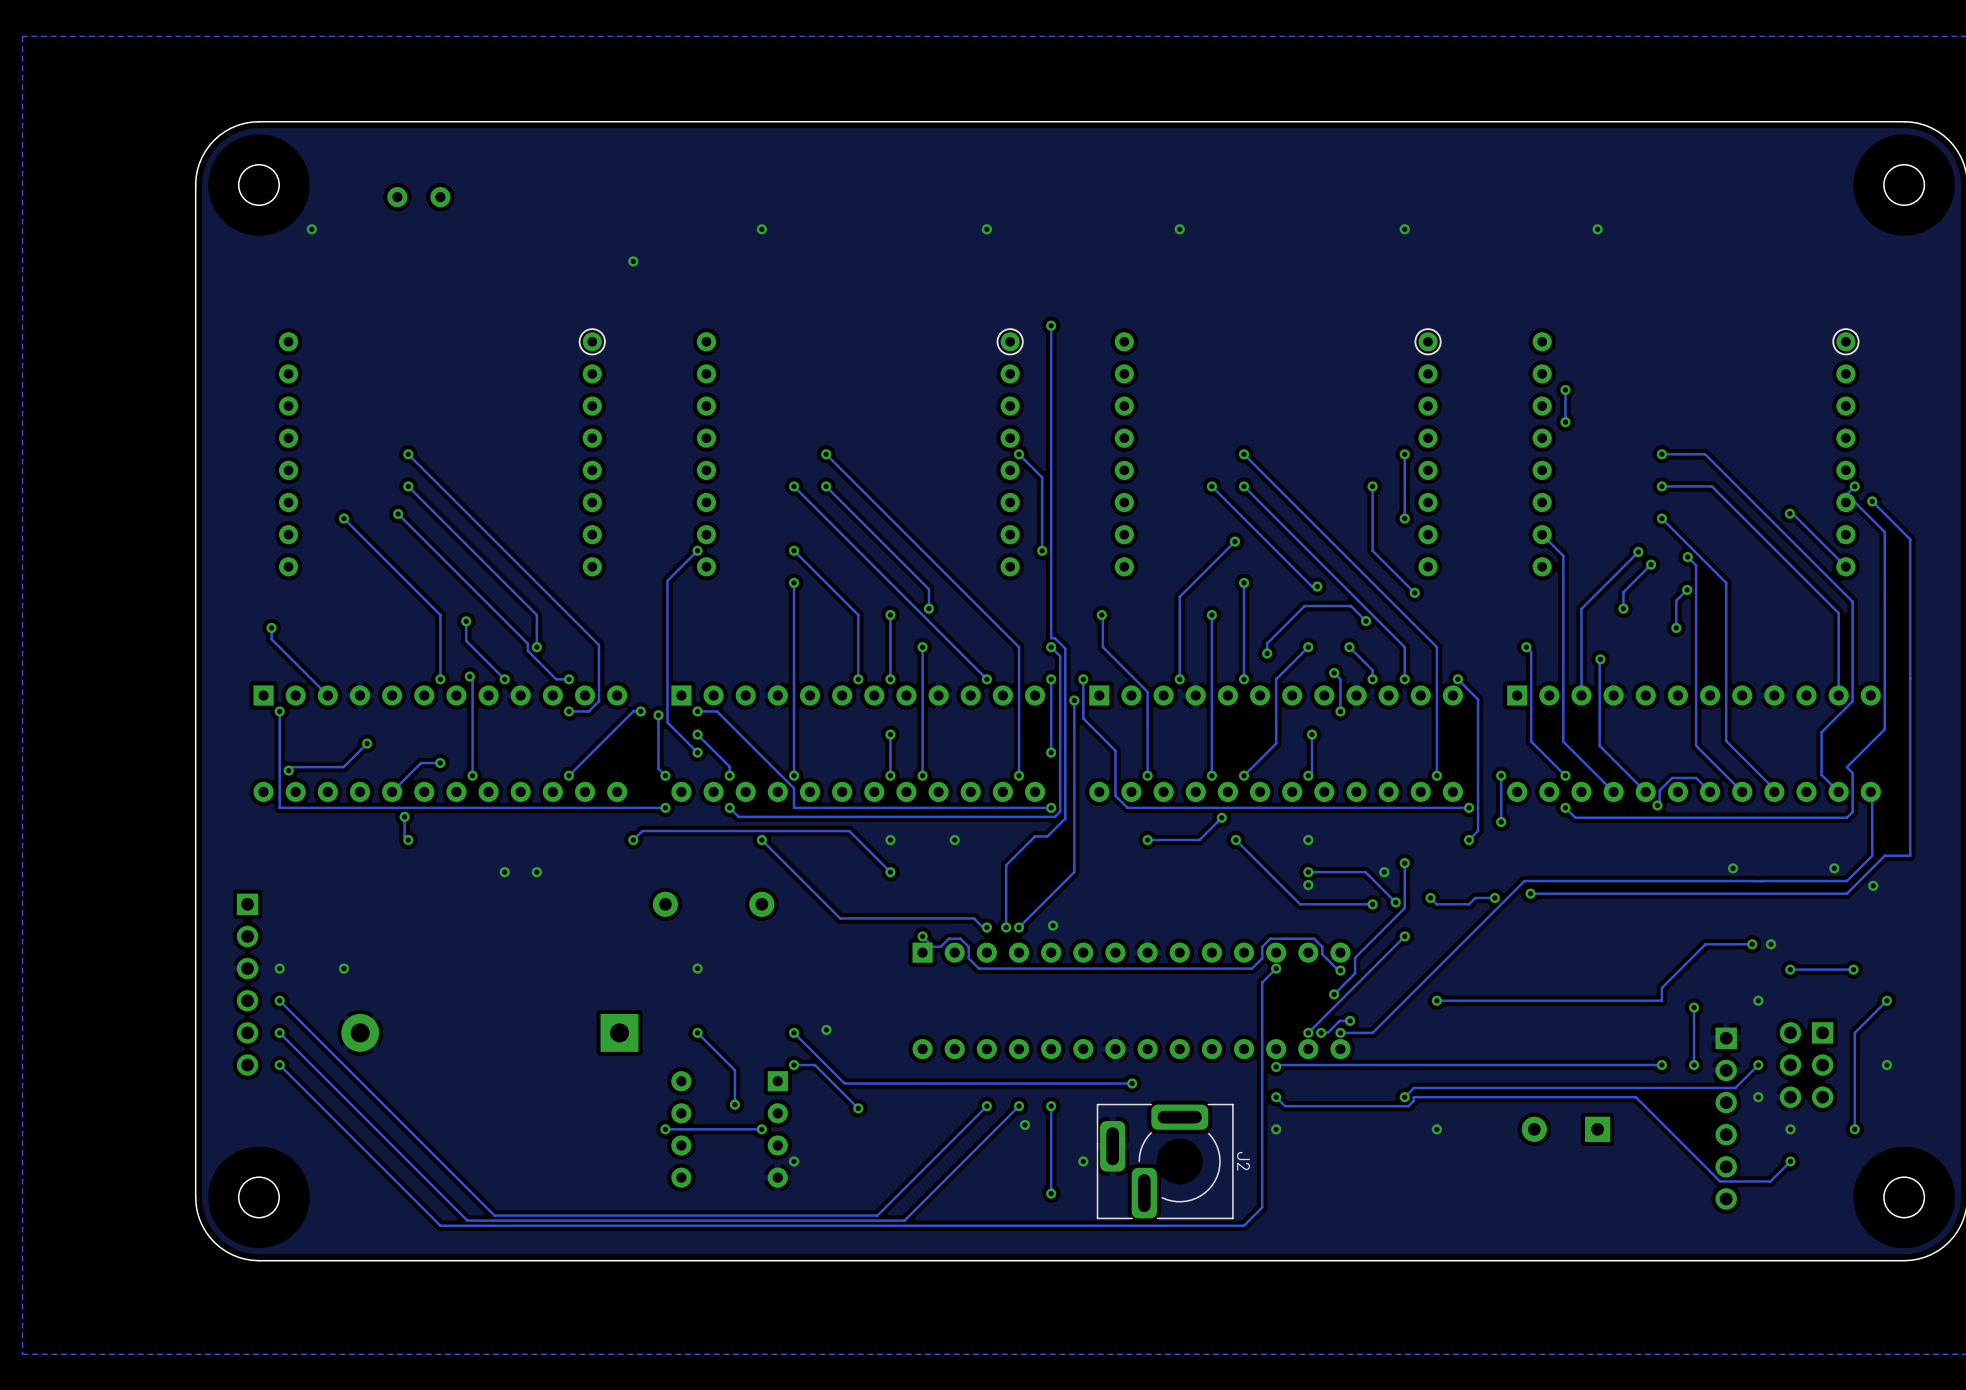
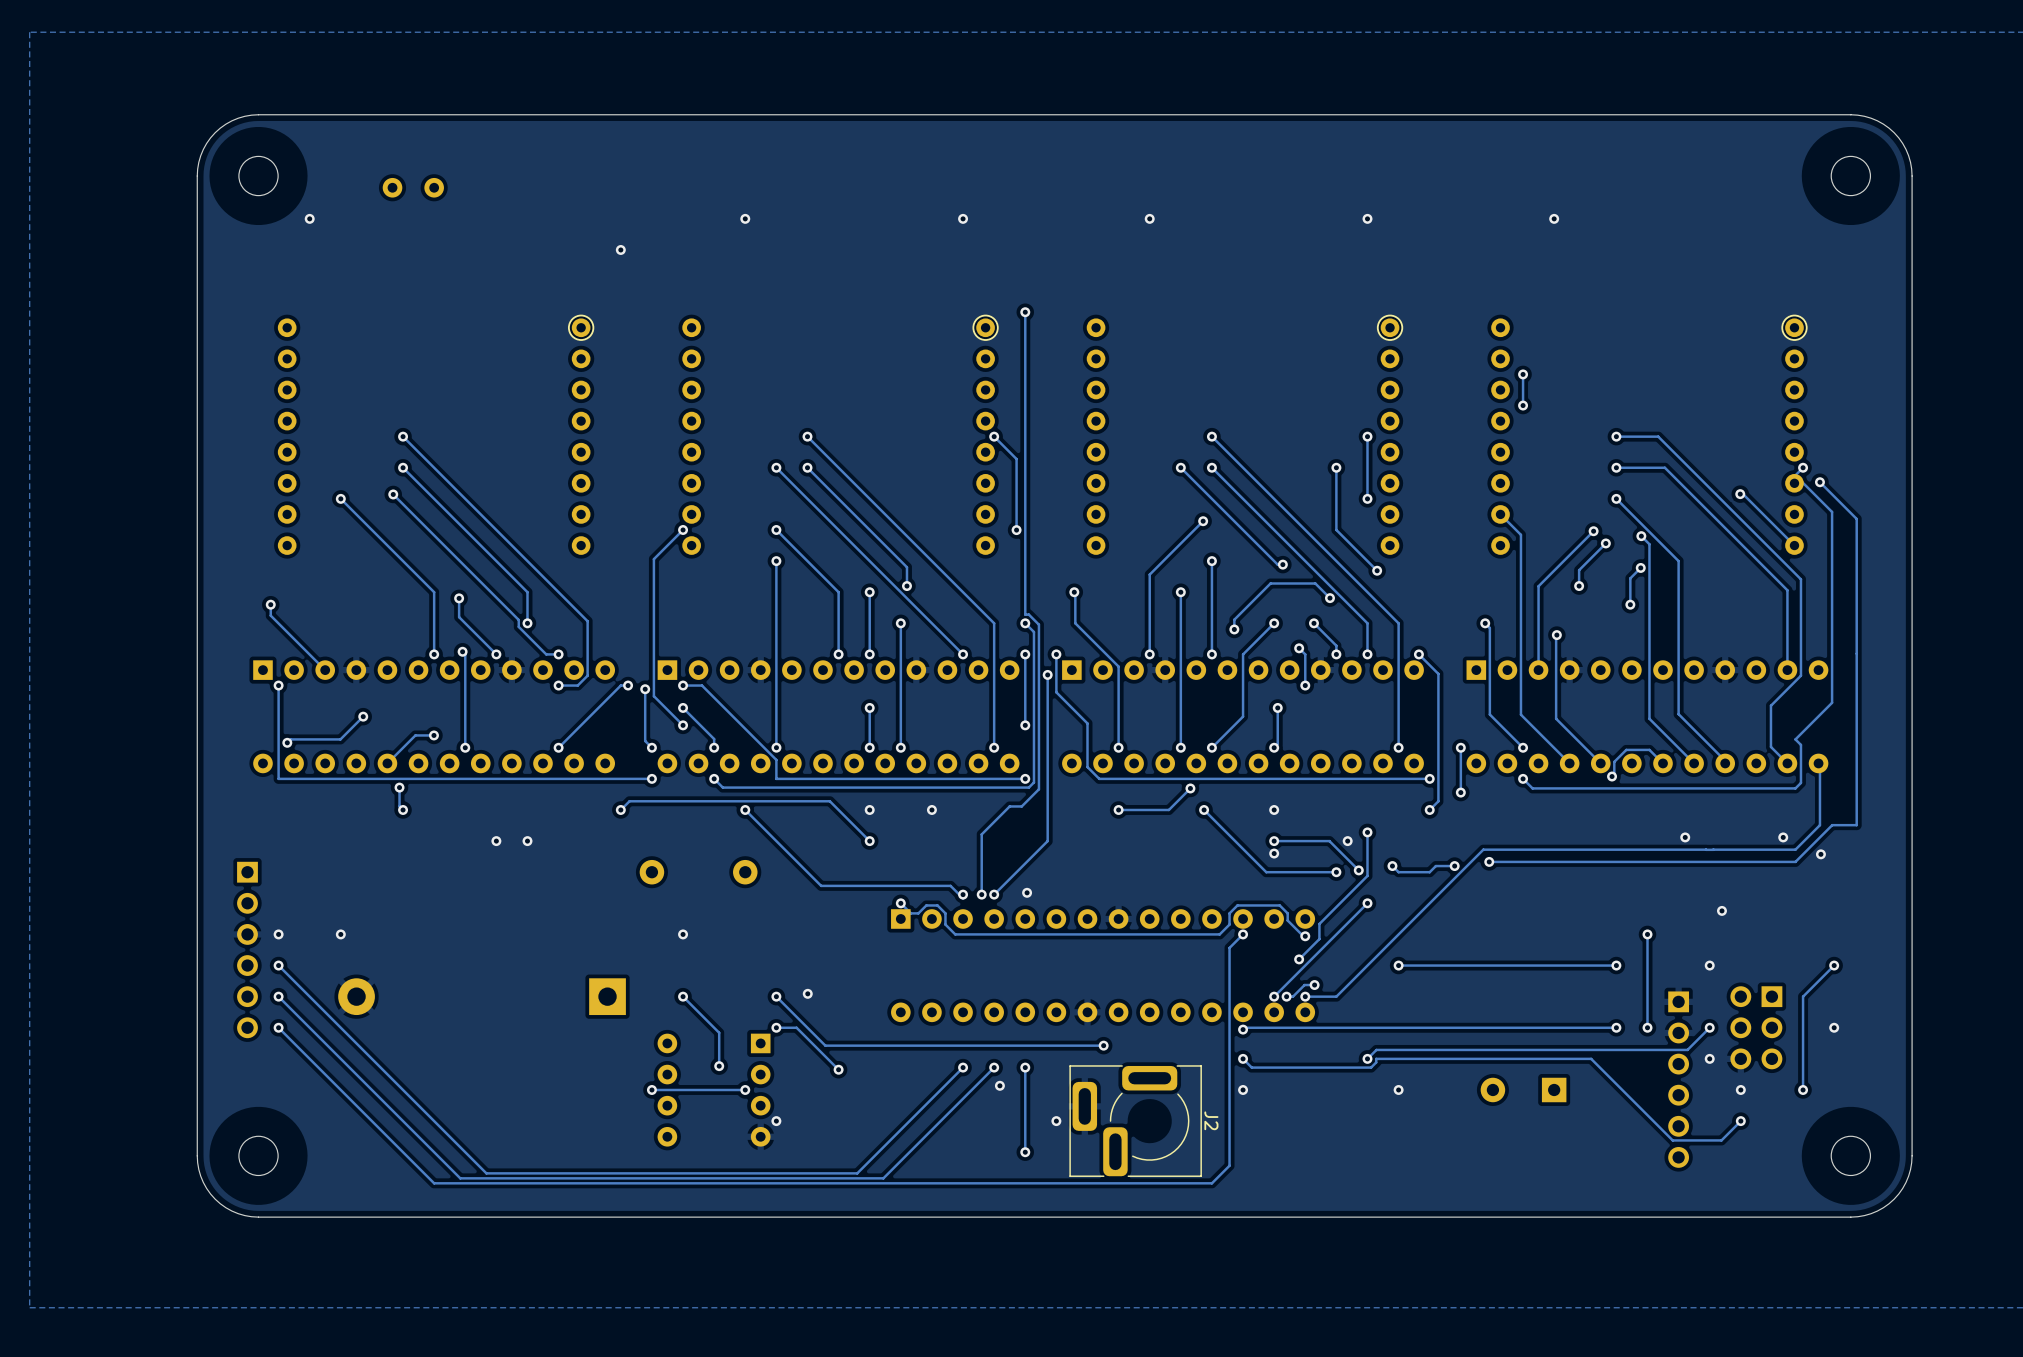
track: (1752, 944) (1705, 944) (1661, 988) (1661, 1000) -> none
via: (1752, 944) -> none
track: none -> (1647, 934) (1647, 972)
via: none -> (1647, 934)
via: (1790, 969) -> none
track: (1853, 969) (1790, 969) -> none
via: (1853, 969) -> none
via: none -> (1616, 965)
via: (1694, 1007) -> none

